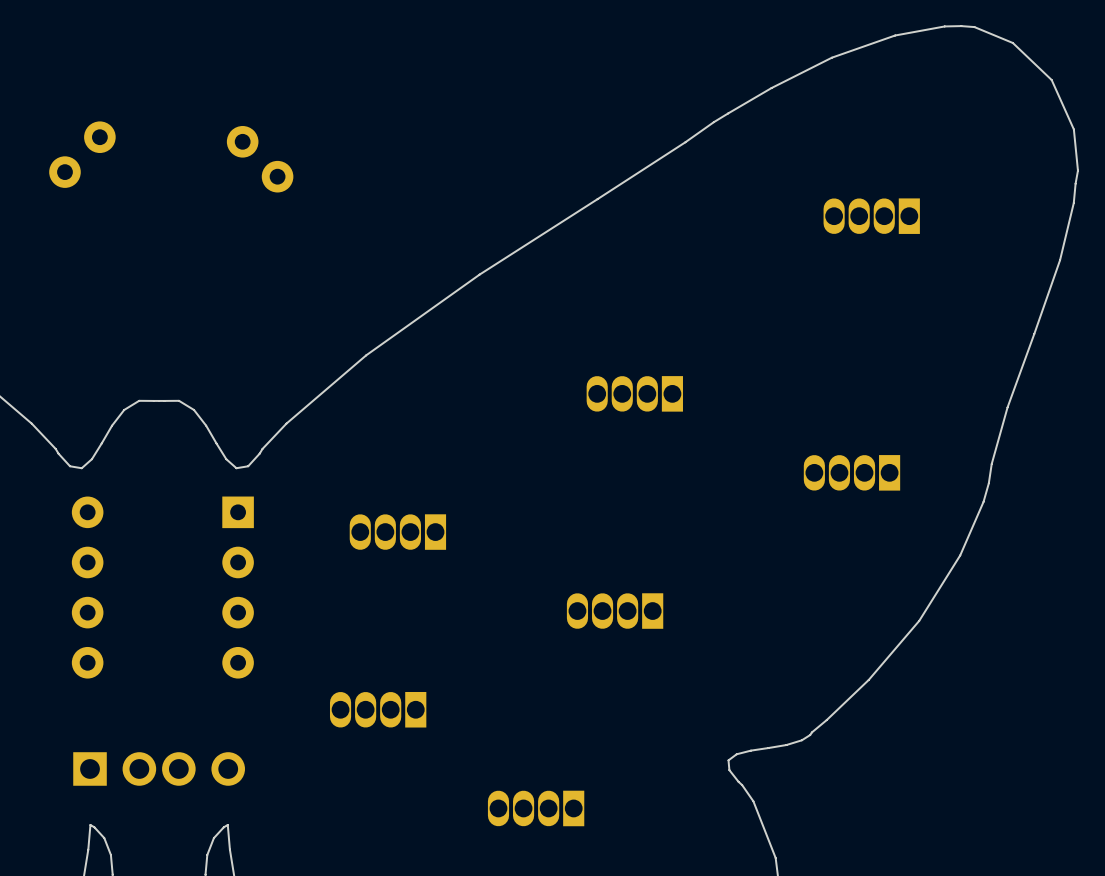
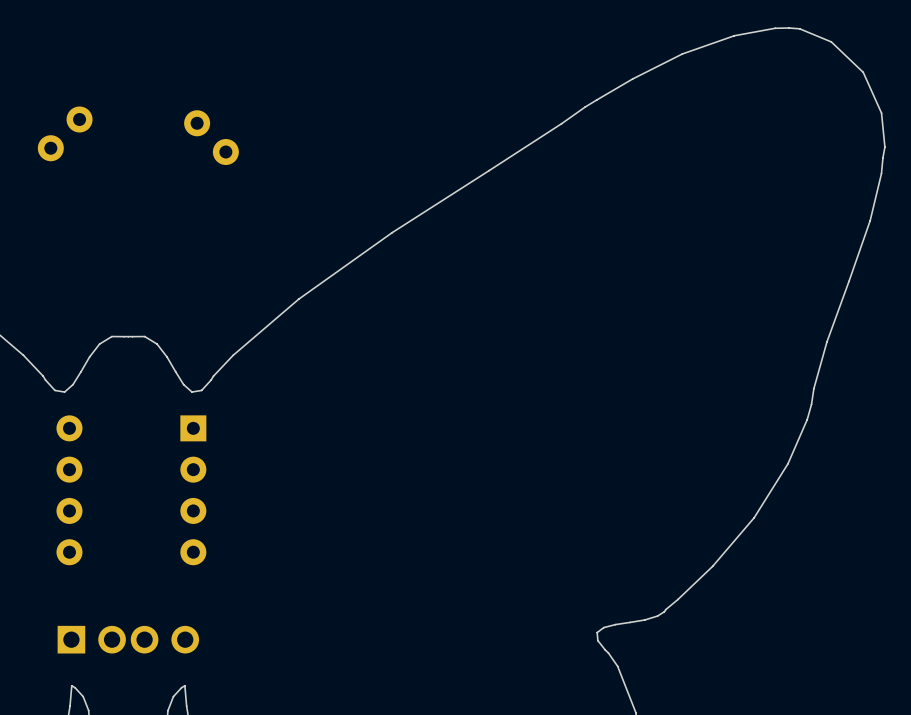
part: (871, 216) -> none
part: (634, 393) -> none
part: (851, 472) -> none
part: (397, 532) -> none
part: (615, 611) -> none
part: (378, 709) -> none
part: (536, 808) -> none

